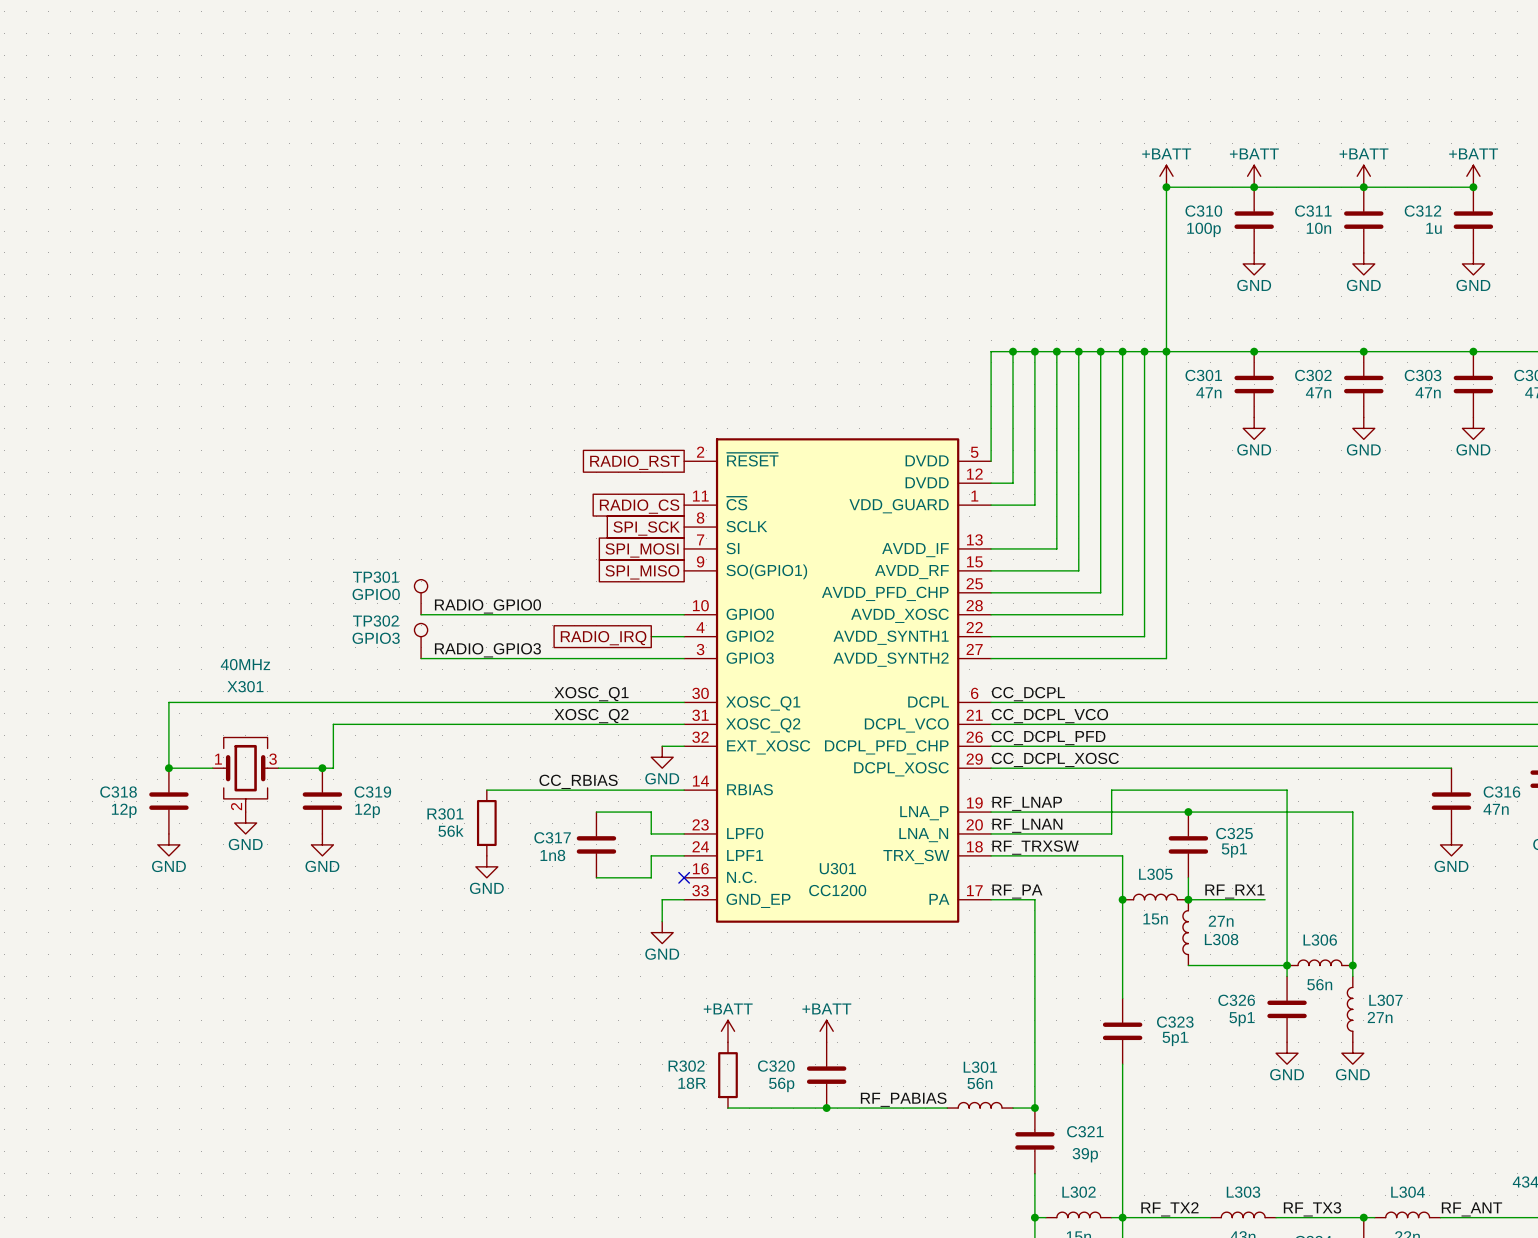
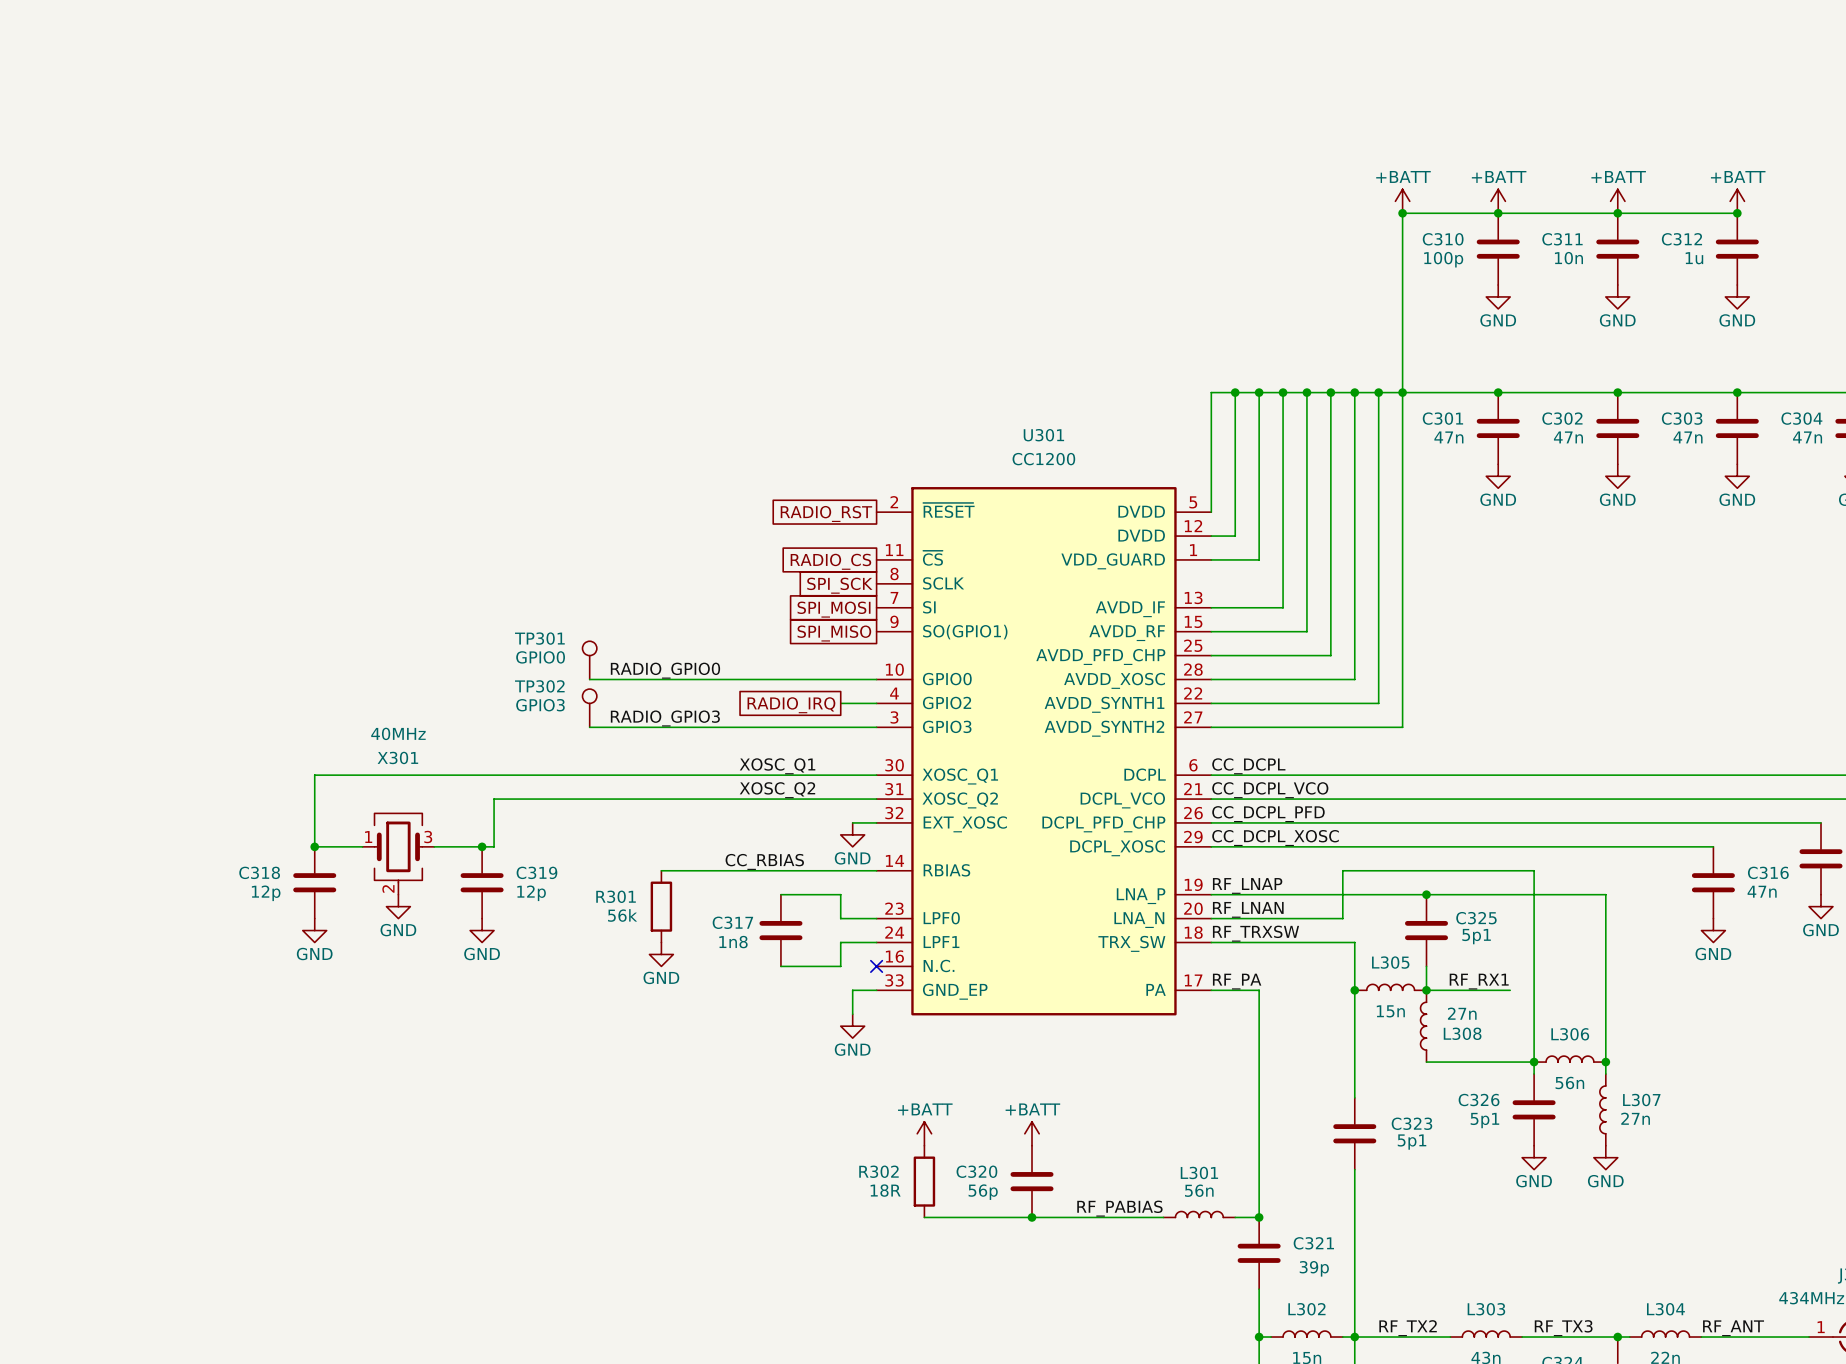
U301 name position: U301 (837, 868) -> U301 (1043, 435)
U301 value position: CC1200 (837, 890) -> CC1200 (1043, 459)

